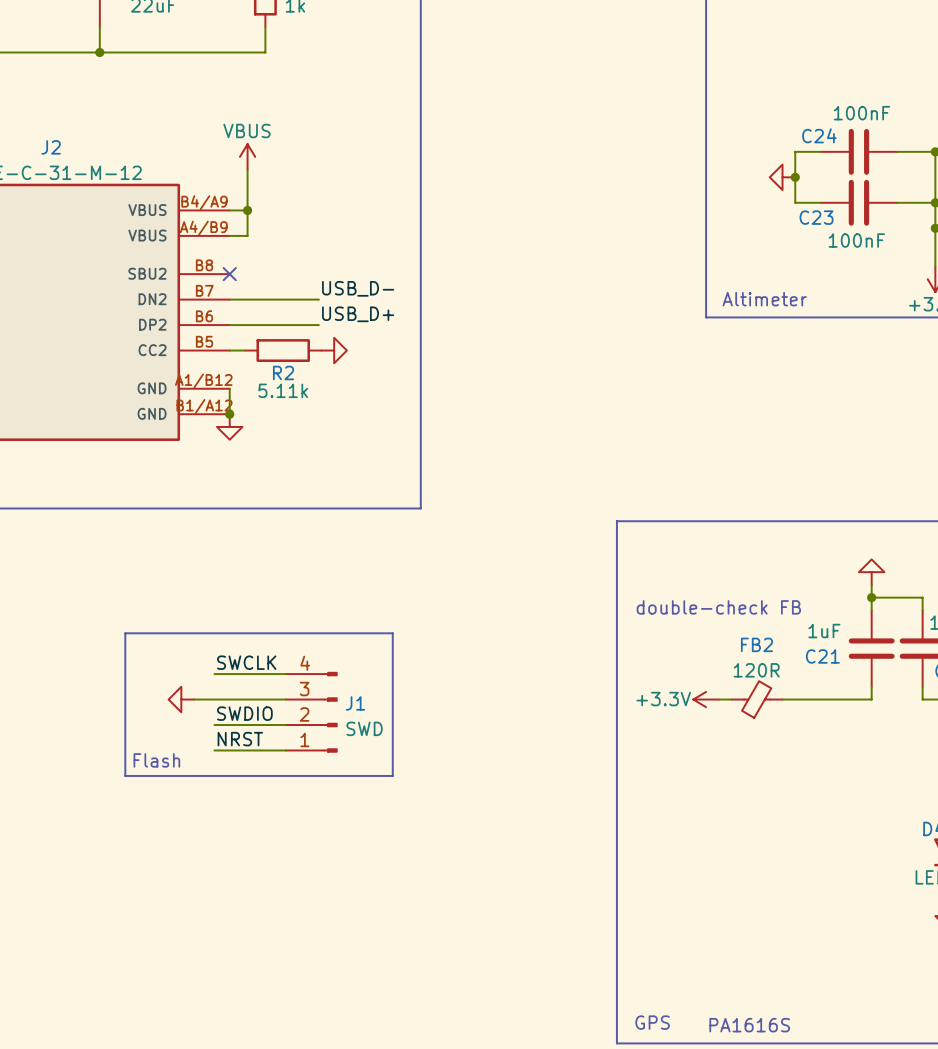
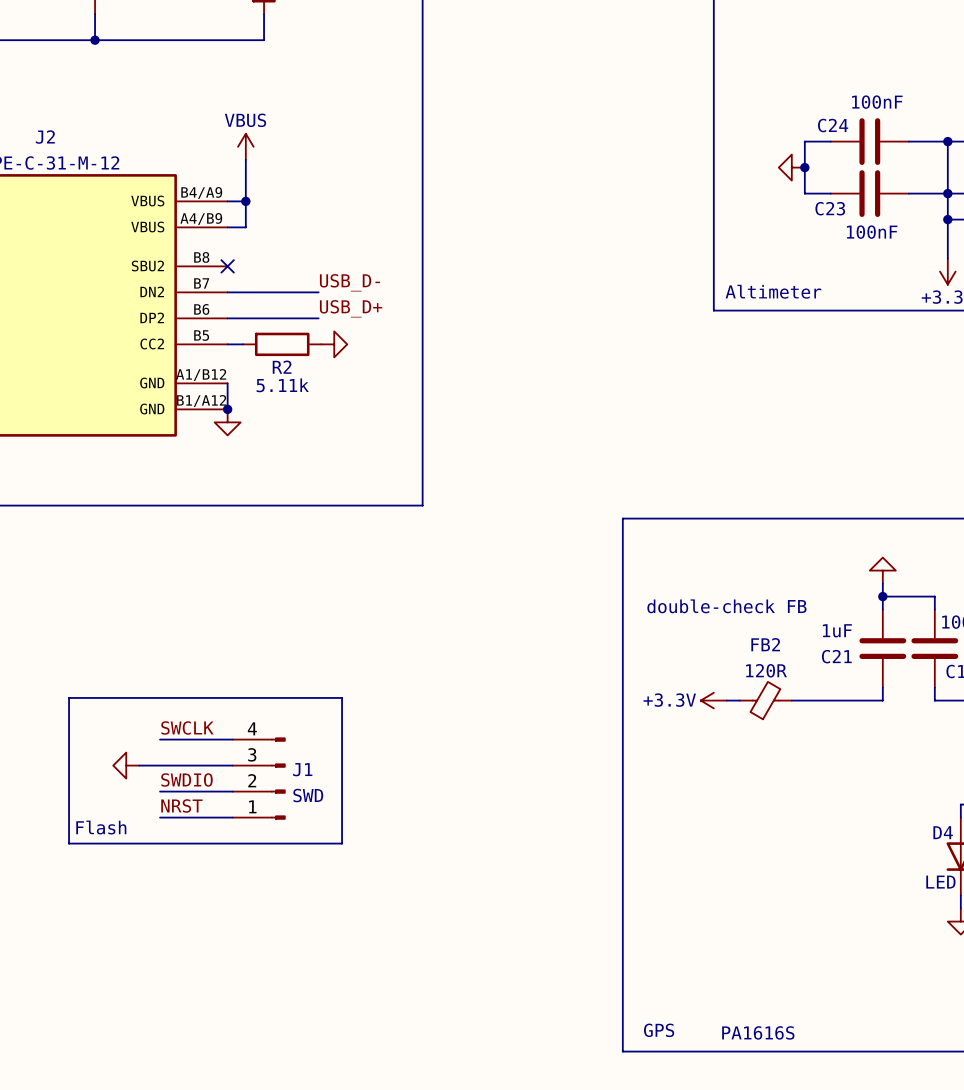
line: (125, 633) (125, 775) (392, 775) (392, 633) (125, 633) -> (69, 697) (69, 843) (342, 843) (342, 697) (69, 697)
label position: SWCLK (246, 662) -> SWCLK (187, 727)
wire: (214, 674) (285, 674) -> (160, 817) (232, 817)
power symbol position: (181, 699) -> (126, 765)
wire: (194, 699) (285, 699) -> (139, 765) (232, 765)
J1 position: (311, 712) -> (259, 778)
label position: SWDIO (244, 713) -> SWDIO (186, 779)
wire: (214, 725) (285, 725) -> (160, 739) (232, 739)
label position: NRST (240, 739) -> NRST (181, 805)
wire: (214, 750) (285, 750) -> (160, 791) (232, 791)
text position: Flash (156, 760) -> Flash (101, 827)

